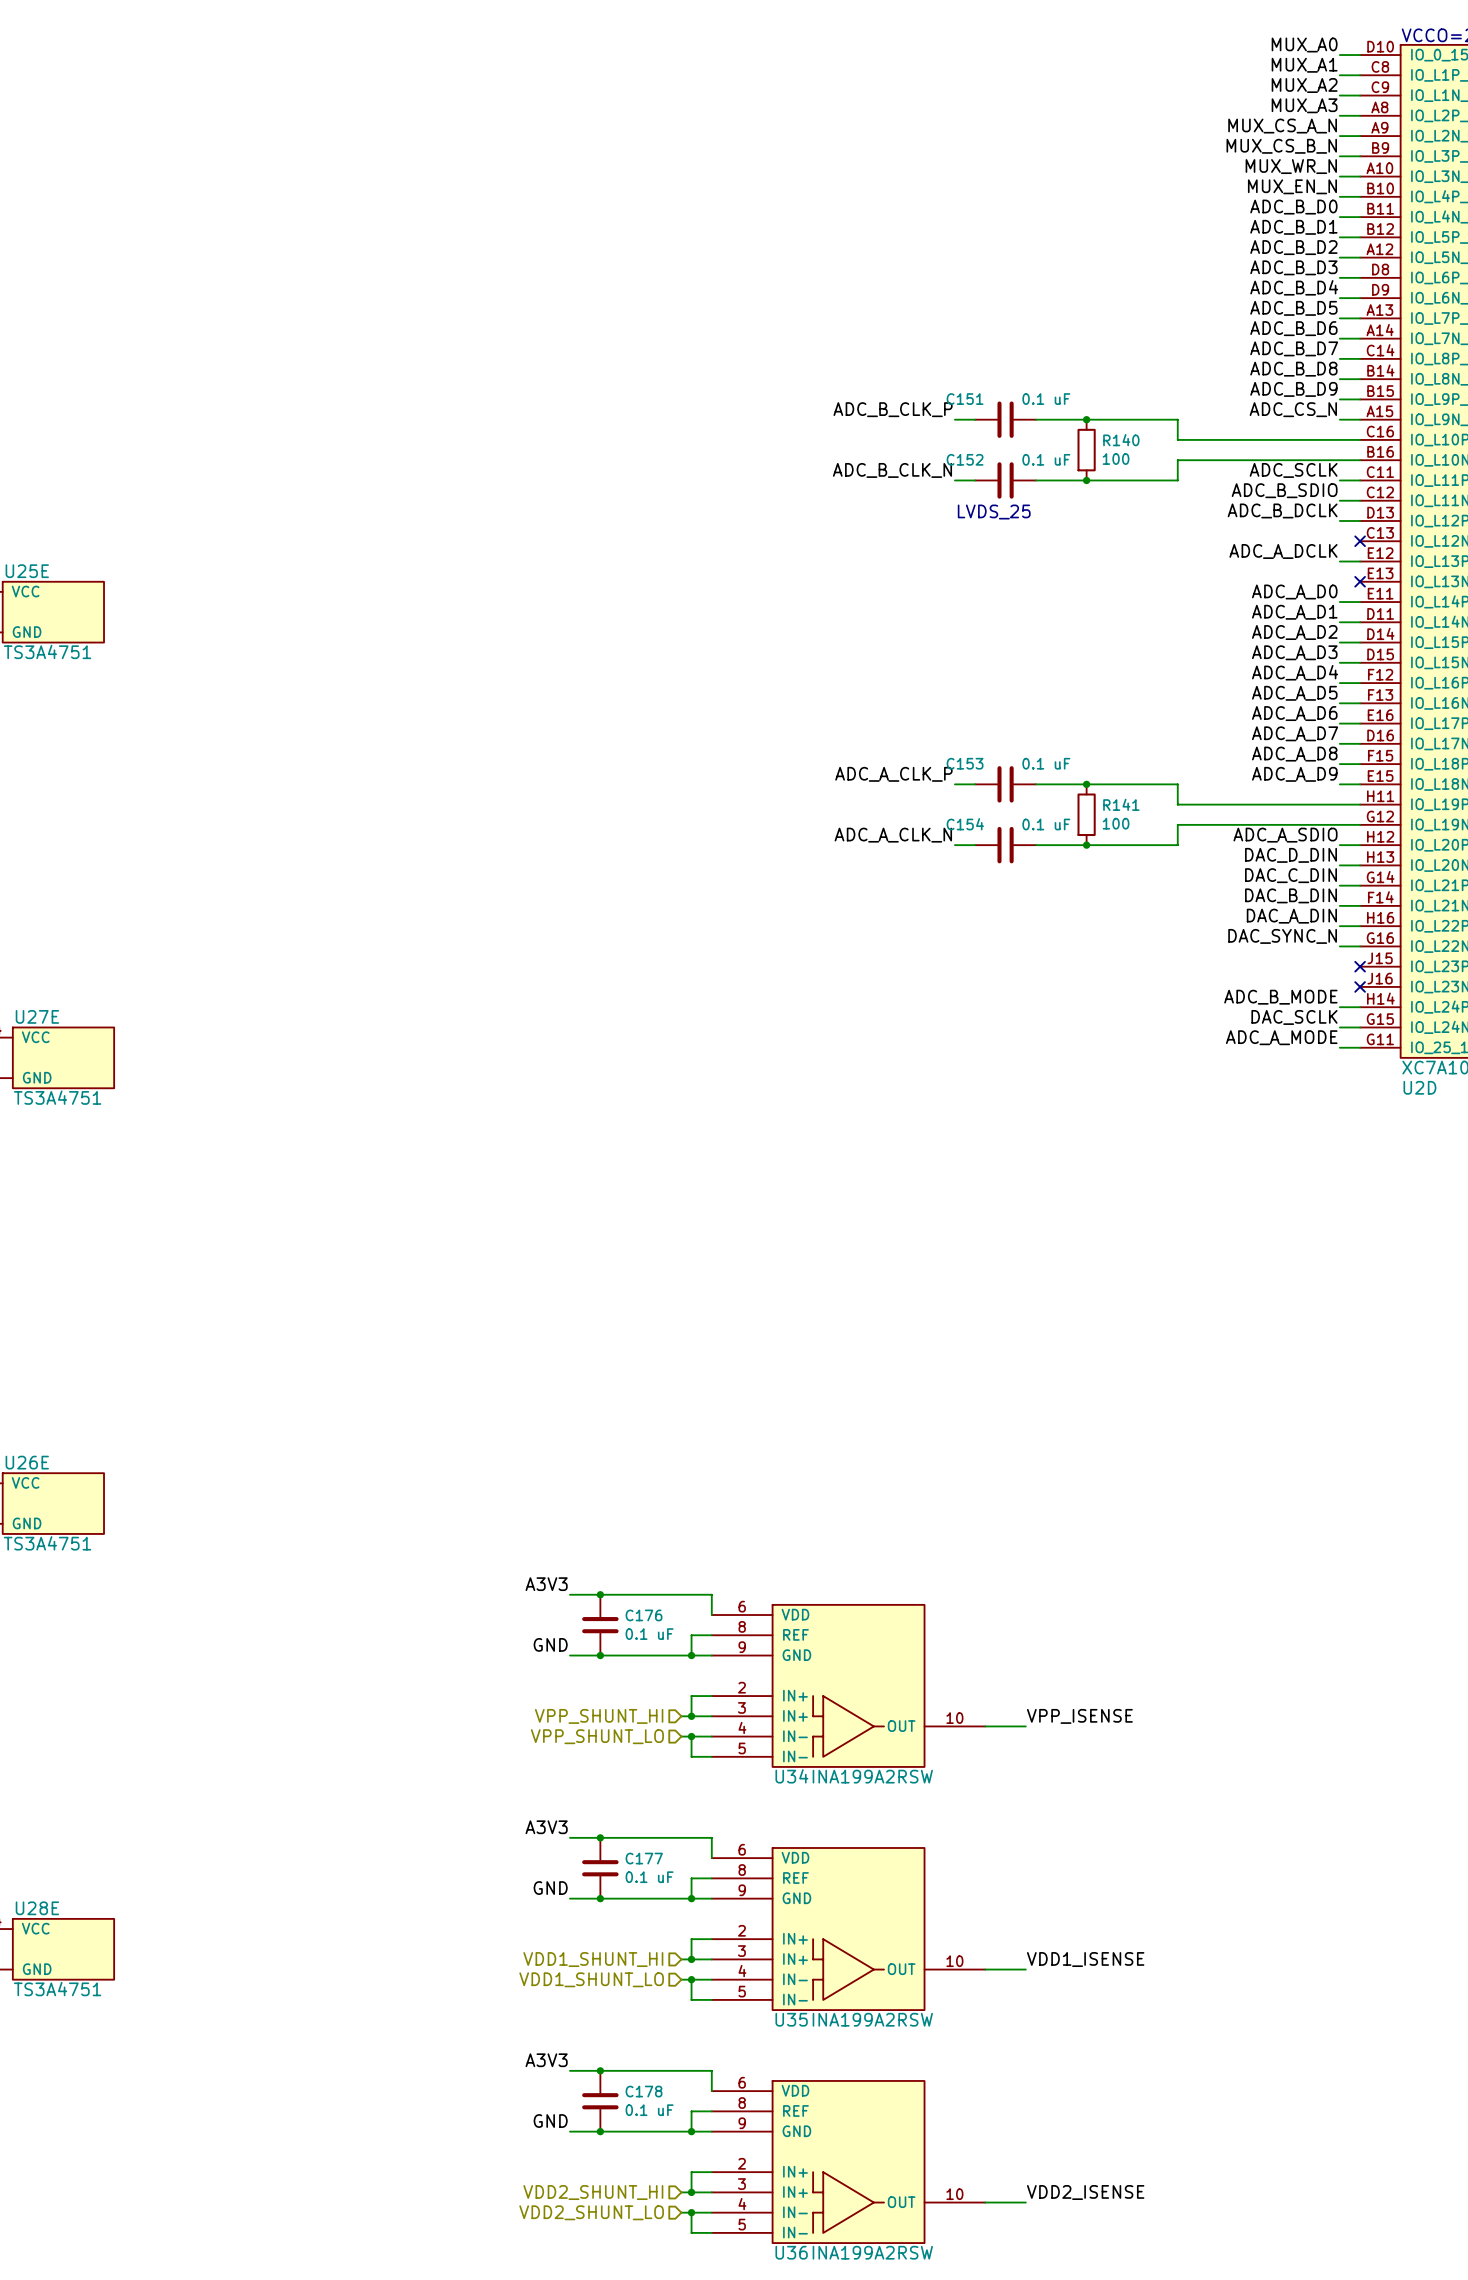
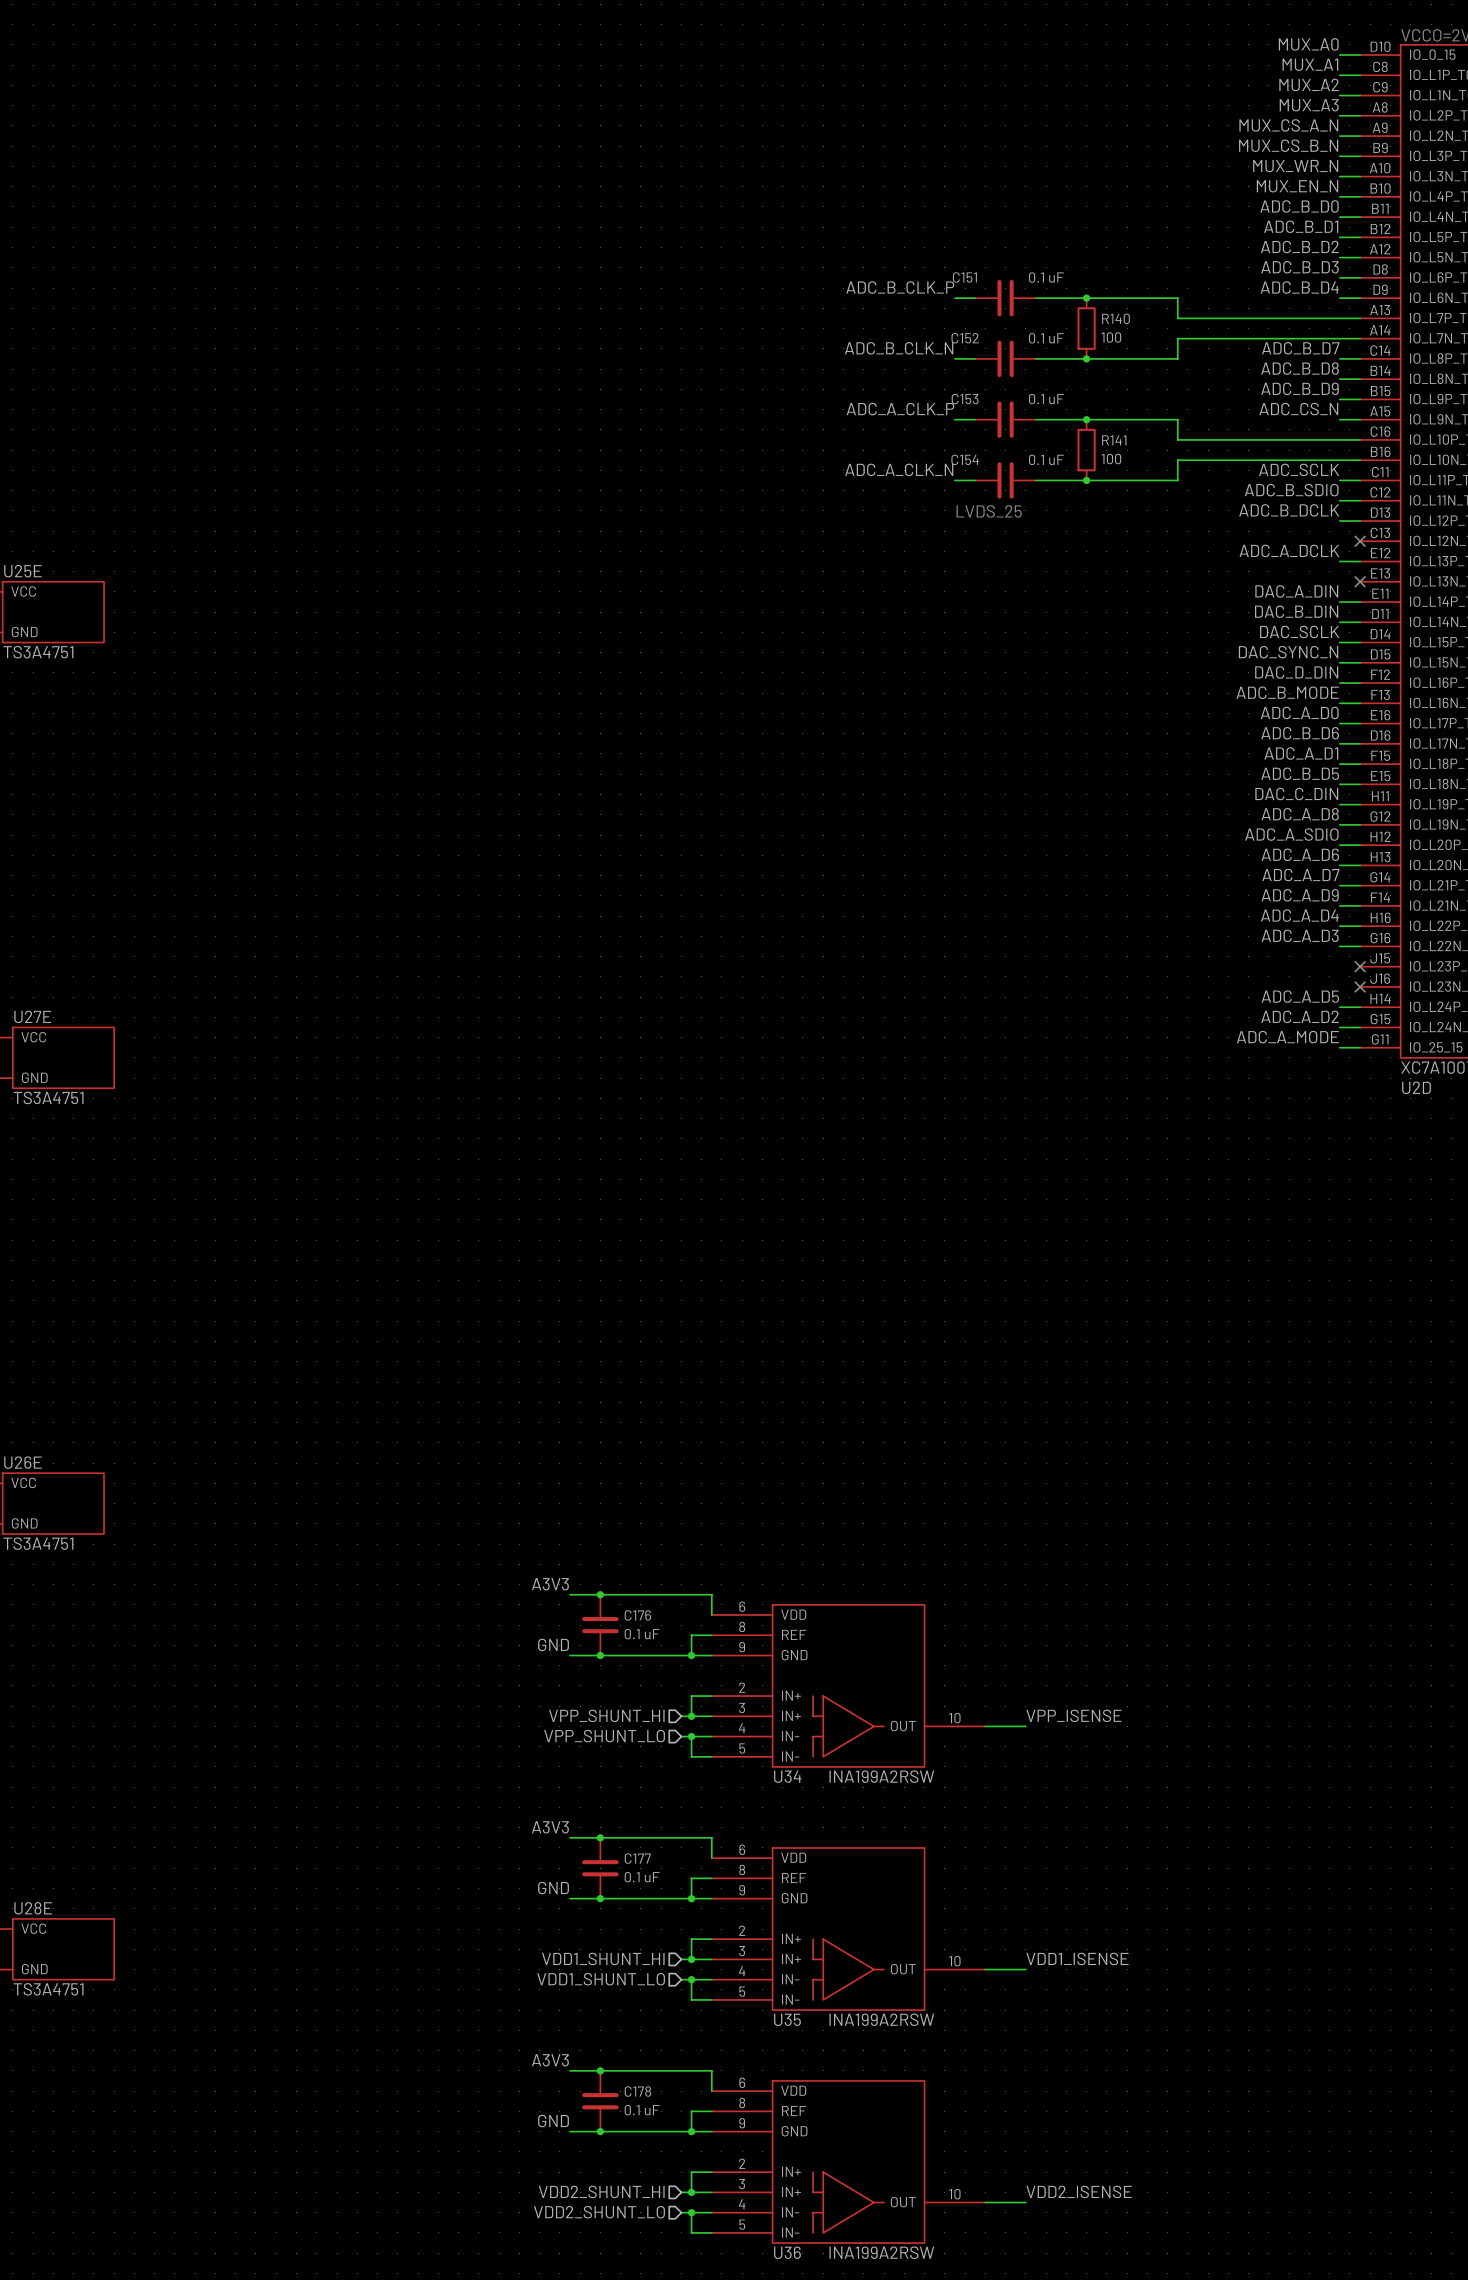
label: none -> ADC_B_CLK_P (900, 287)
wire: none -> (954, 298) (975, 298)
C151: none -> 0.1 uF (1005, 298)
wire: none -> (1035, 298) (1177, 298) (1177, 318) (1339, 318)
junction: none -> (1086, 298)
label: ADC_B_D5 (1293, 308) -> none
R140: none -> 100 (1086, 328)
label: ADC_B_D6 (1293, 328) -> none
wire: none -> (1339, 338) (1177, 338) (1177, 358) (1035, 358)
label: none -> ADC_B_CLK_N (899, 348)
wire: none -> (954, 358) (975, 358)
C152: none -> 0.1 uF (1005, 358)
junction: none -> (1086, 358)
C151 name: C151 (965, 399) -> C153 (965, 399)
label: ADC_B_CLK_P (893, 409) -> ADC_A_CLK_P (900, 409)
R140 name: R140 (1121, 440) -> R141 (1114, 440)
C152 name: C152 (965, 459) -> C154 (965, 459)
label: ADC_B_CLK_N (892, 470) -> ADC_A_CLK_N (899, 469)
label: ADC_A_D0 (1294, 592) -> DAC_A_DIN (1296, 591)
label: ADC_A_D1 (1294, 612) -> DAC_B_DIN (1296, 611)
label: ADC_A_D2 (1294, 632) -> DAC_SCLK (1299, 631)
label: ADC_A_D3 (1294, 652) -> DAC_SYNC_N (1288, 652)
label: ADC_A_D4 (1295, 672) -> DAC_D_DIN (1296, 672)
label: ADC_A_D5 (1294, 693) -> ADC_B_MODE (1287, 692)
label: ADC_A_D6 (1294, 713) -> ADC_A_D0 (1299, 712)
label: ADC_A_D7 (1295, 733) -> ADC_B_D6 (1300, 733)
label: ADC_A_D8 (1294, 754) -> ADC_A_D1 (1301, 753)
label: ADC_A_CLK_P (893, 774) -> none
label: ADC_A_D9 (1294, 774) -> ADC_B_D5 (1300, 773)
wire: (954, 784) (975, 784) -> none
C153: 0.1 uF (1005, 784) -> none
wire: (1035, 784) (1177, 784) (1177, 804) (1339, 804) -> none
junction: (1086, 784) -> none
label: none -> DAC_C_DIN (1296, 794)
R141: 100 (1086, 814) -> none
label: none -> ADC_A_D8 (1300, 814)
wire: (1339, 824) (1177, 824) (1177, 845) (1035, 845) -> none
label: ADC_A_CLK_N (893, 835) -> none
wire: (954, 845) (975, 845) -> none
C154: 0.1 uF (1005, 845) -> none
junction: (1086, 845) -> none
label: DAC_D_DIN (1291, 855) -> ADC_A_D6 (1300, 854)
label: DAC_C_DIN (1291, 875) -> ADC_A_D7 (1300, 875)
label: DAC_B_DIN (1291, 895) -> ADC_A_D9 (1300, 895)
label: DAC_A_DIN (1291, 916) -> ADC_A_D4 (1299, 915)
label: DAC_SYNC_N (1282, 936) -> ADC_A_D3 (1300, 935)
label: ADC_B_MODE (1280, 997) -> ADC_A_D5 (1300, 996)
label: DAC_SCLK (1294, 1017) -> ADC_A_D2 (1300, 1016)

